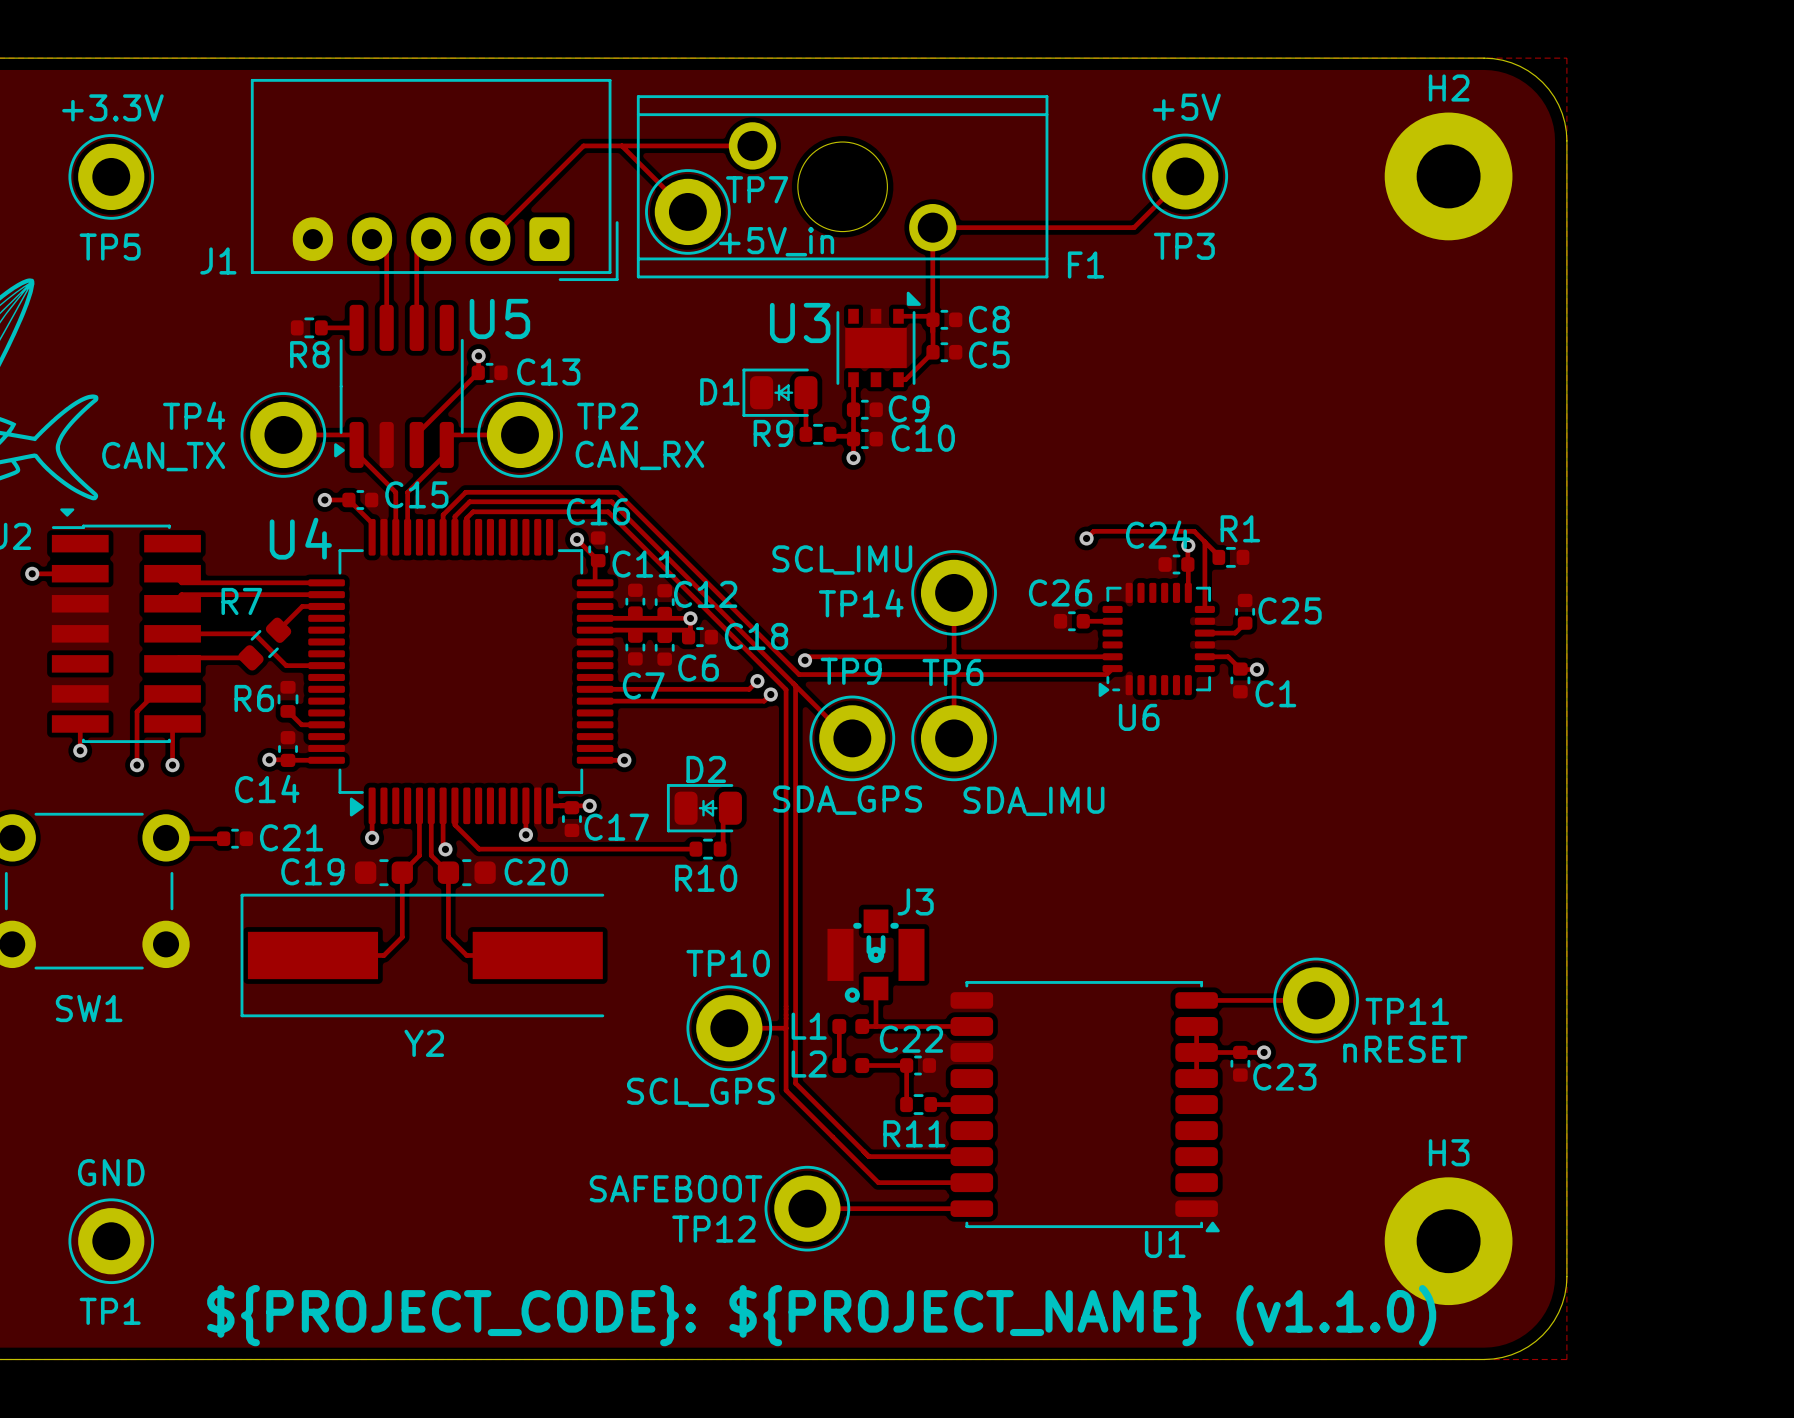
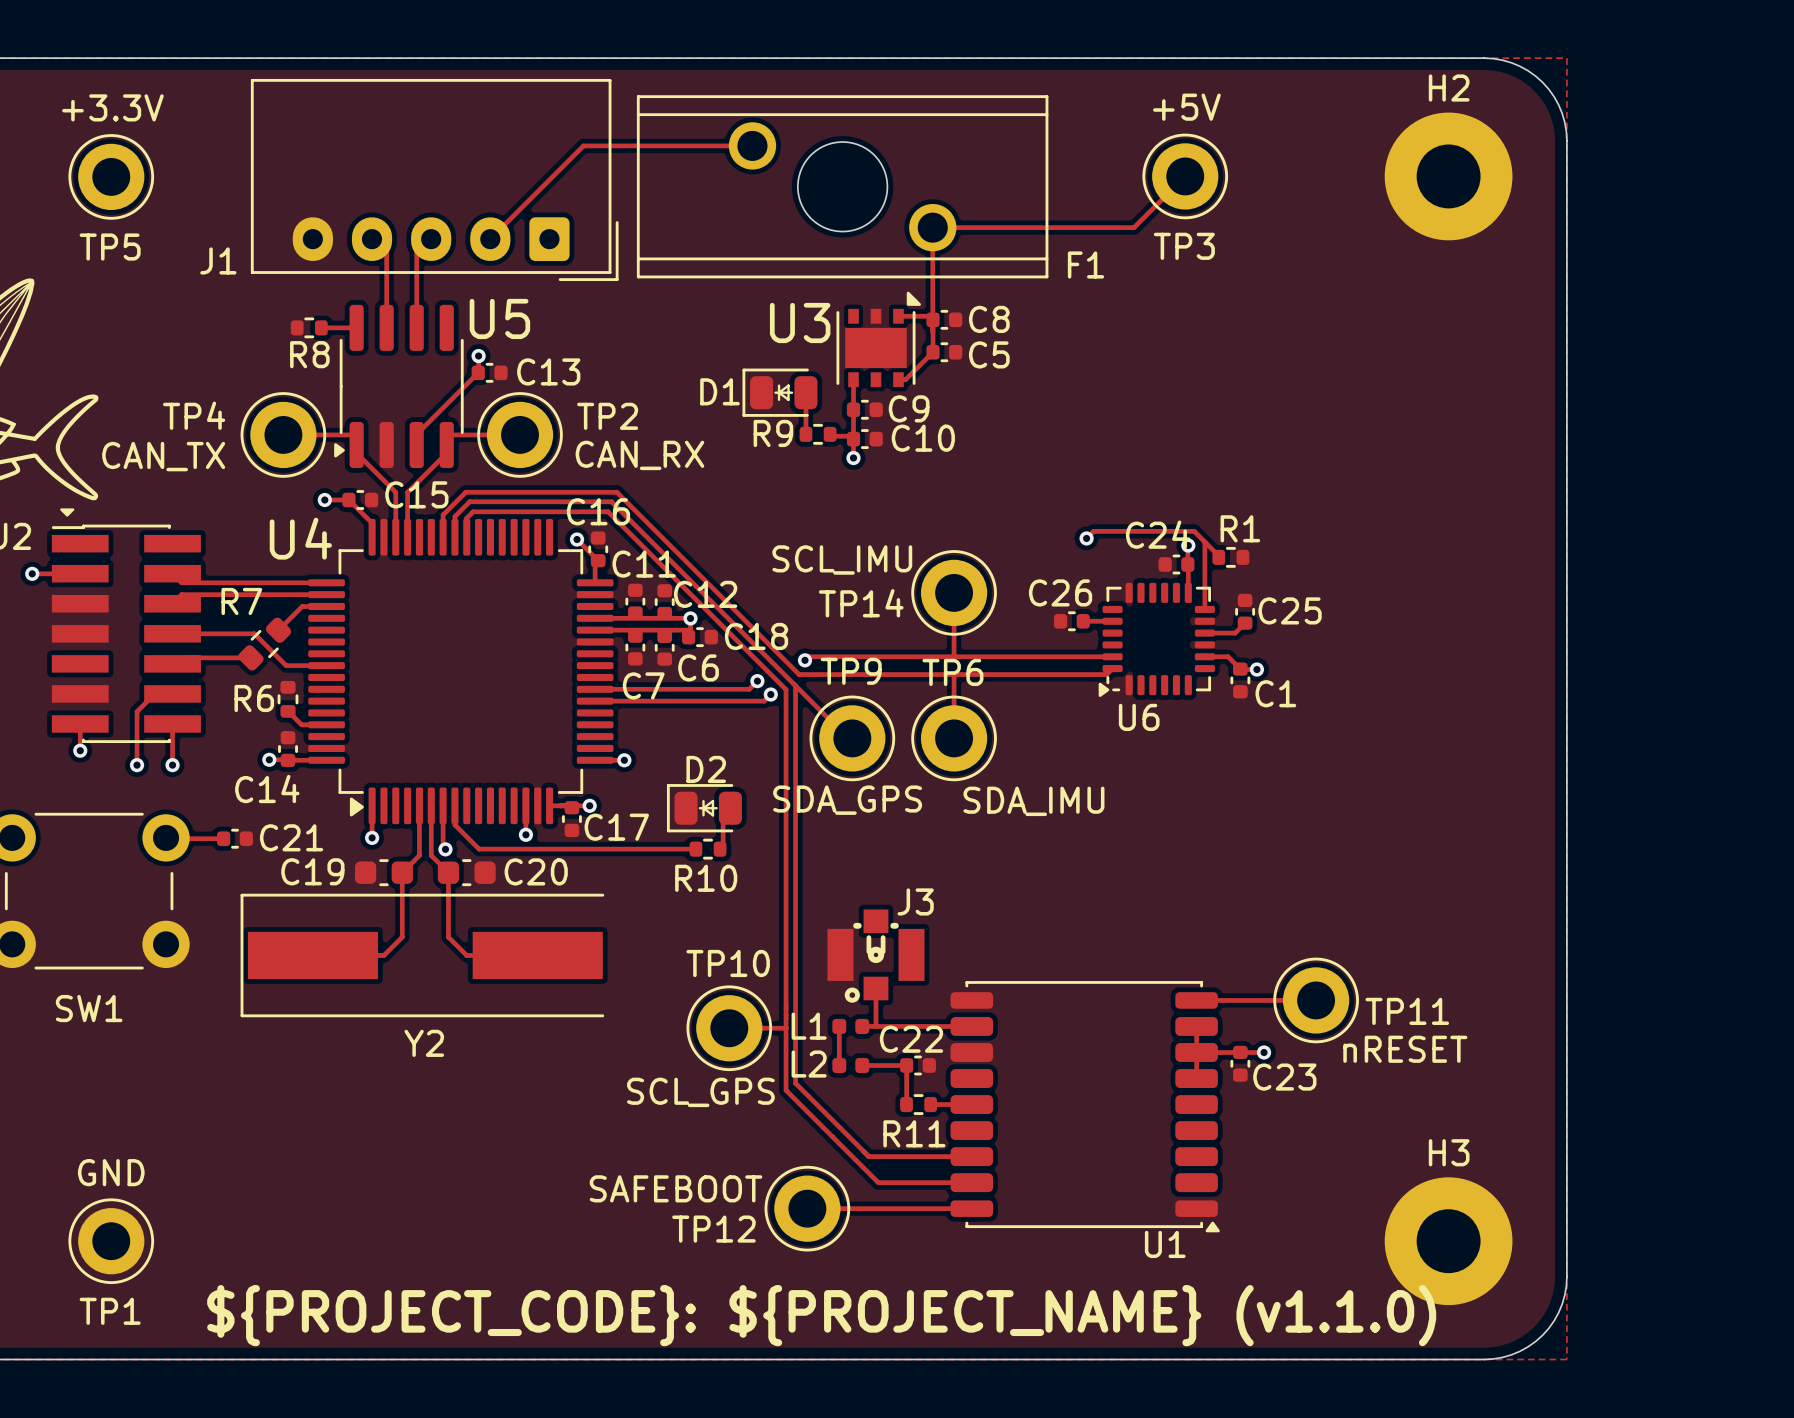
track: (621, 145) (687, 211) -> none
TP7: (687, 211) -> none

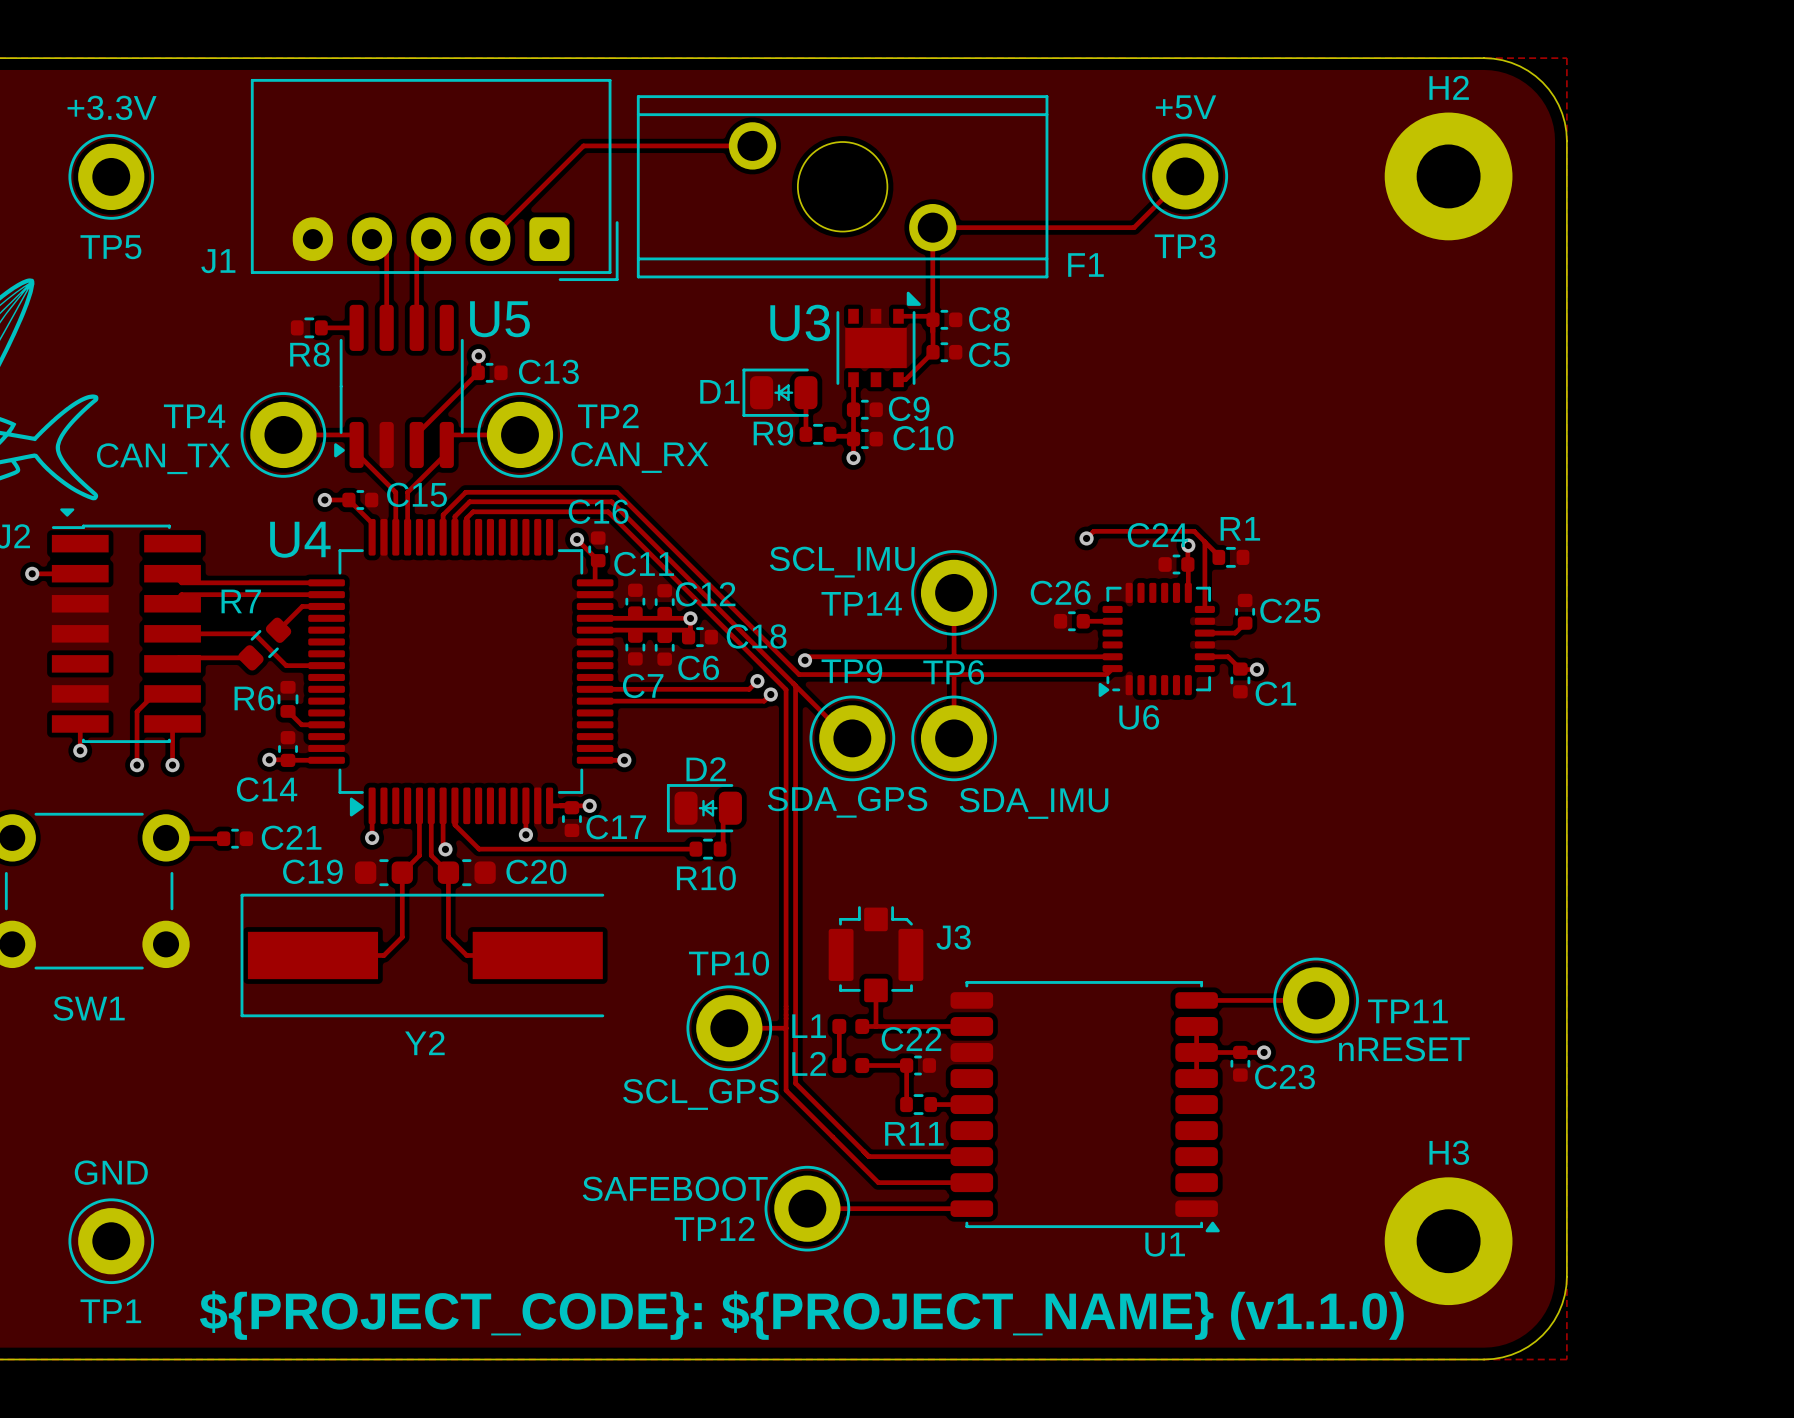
J3 name position: J3 (915, 901) -> J3 (953, 937)
J3 footprint: [827, 909, 925, 1003] -> [828, 906, 924, 1003]

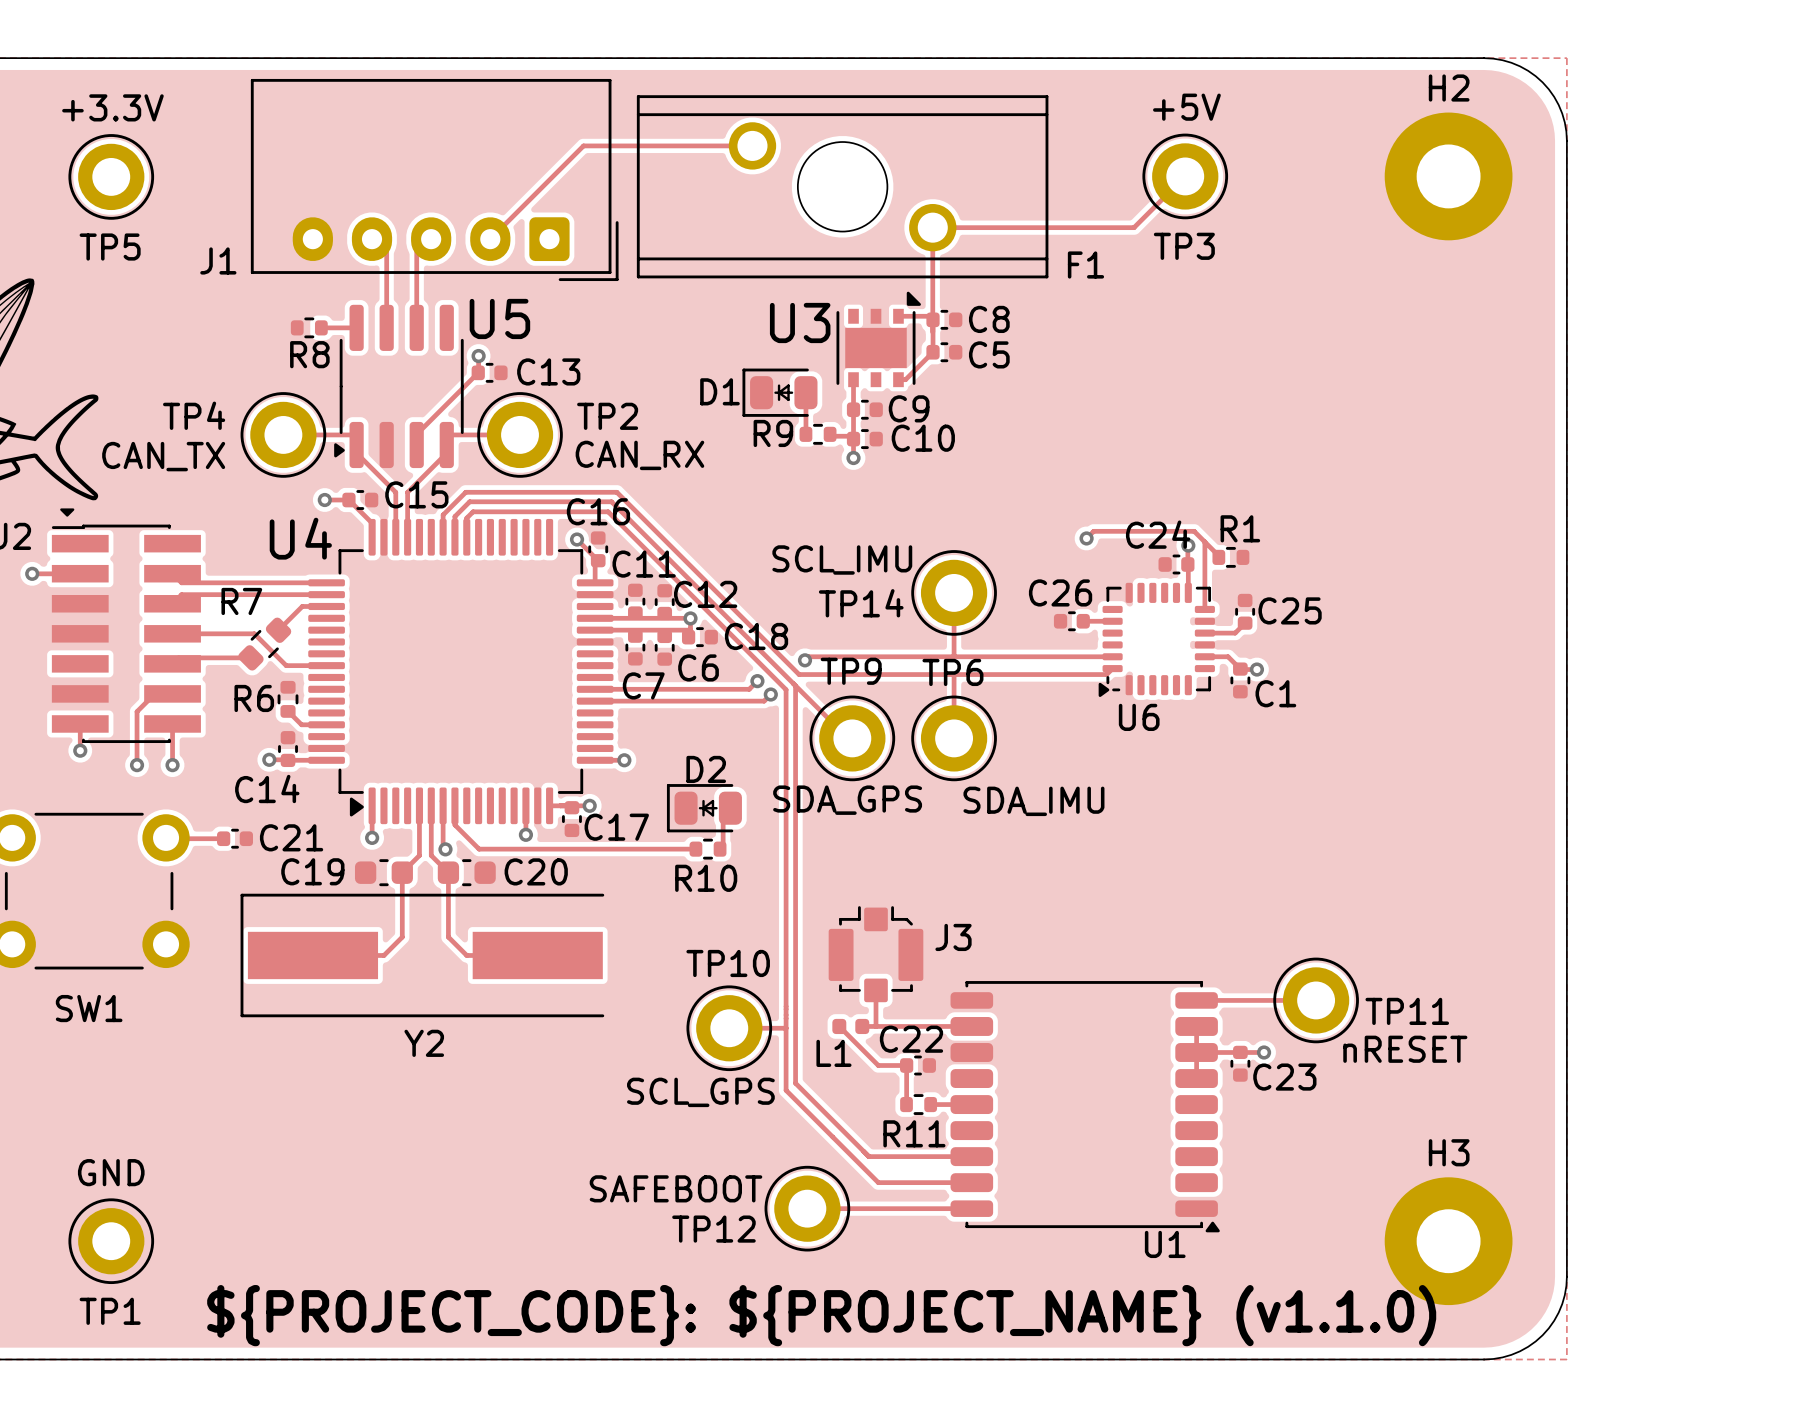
L1 name position: L1 (809, 1026) -> L1 (833, 1053)
track: (839, 1026) (839, 1065) -> (839, 1026) (878, 1065)
L2: (850, 1065) -> none
track: (862, 1065) (878, 1065) -> none

